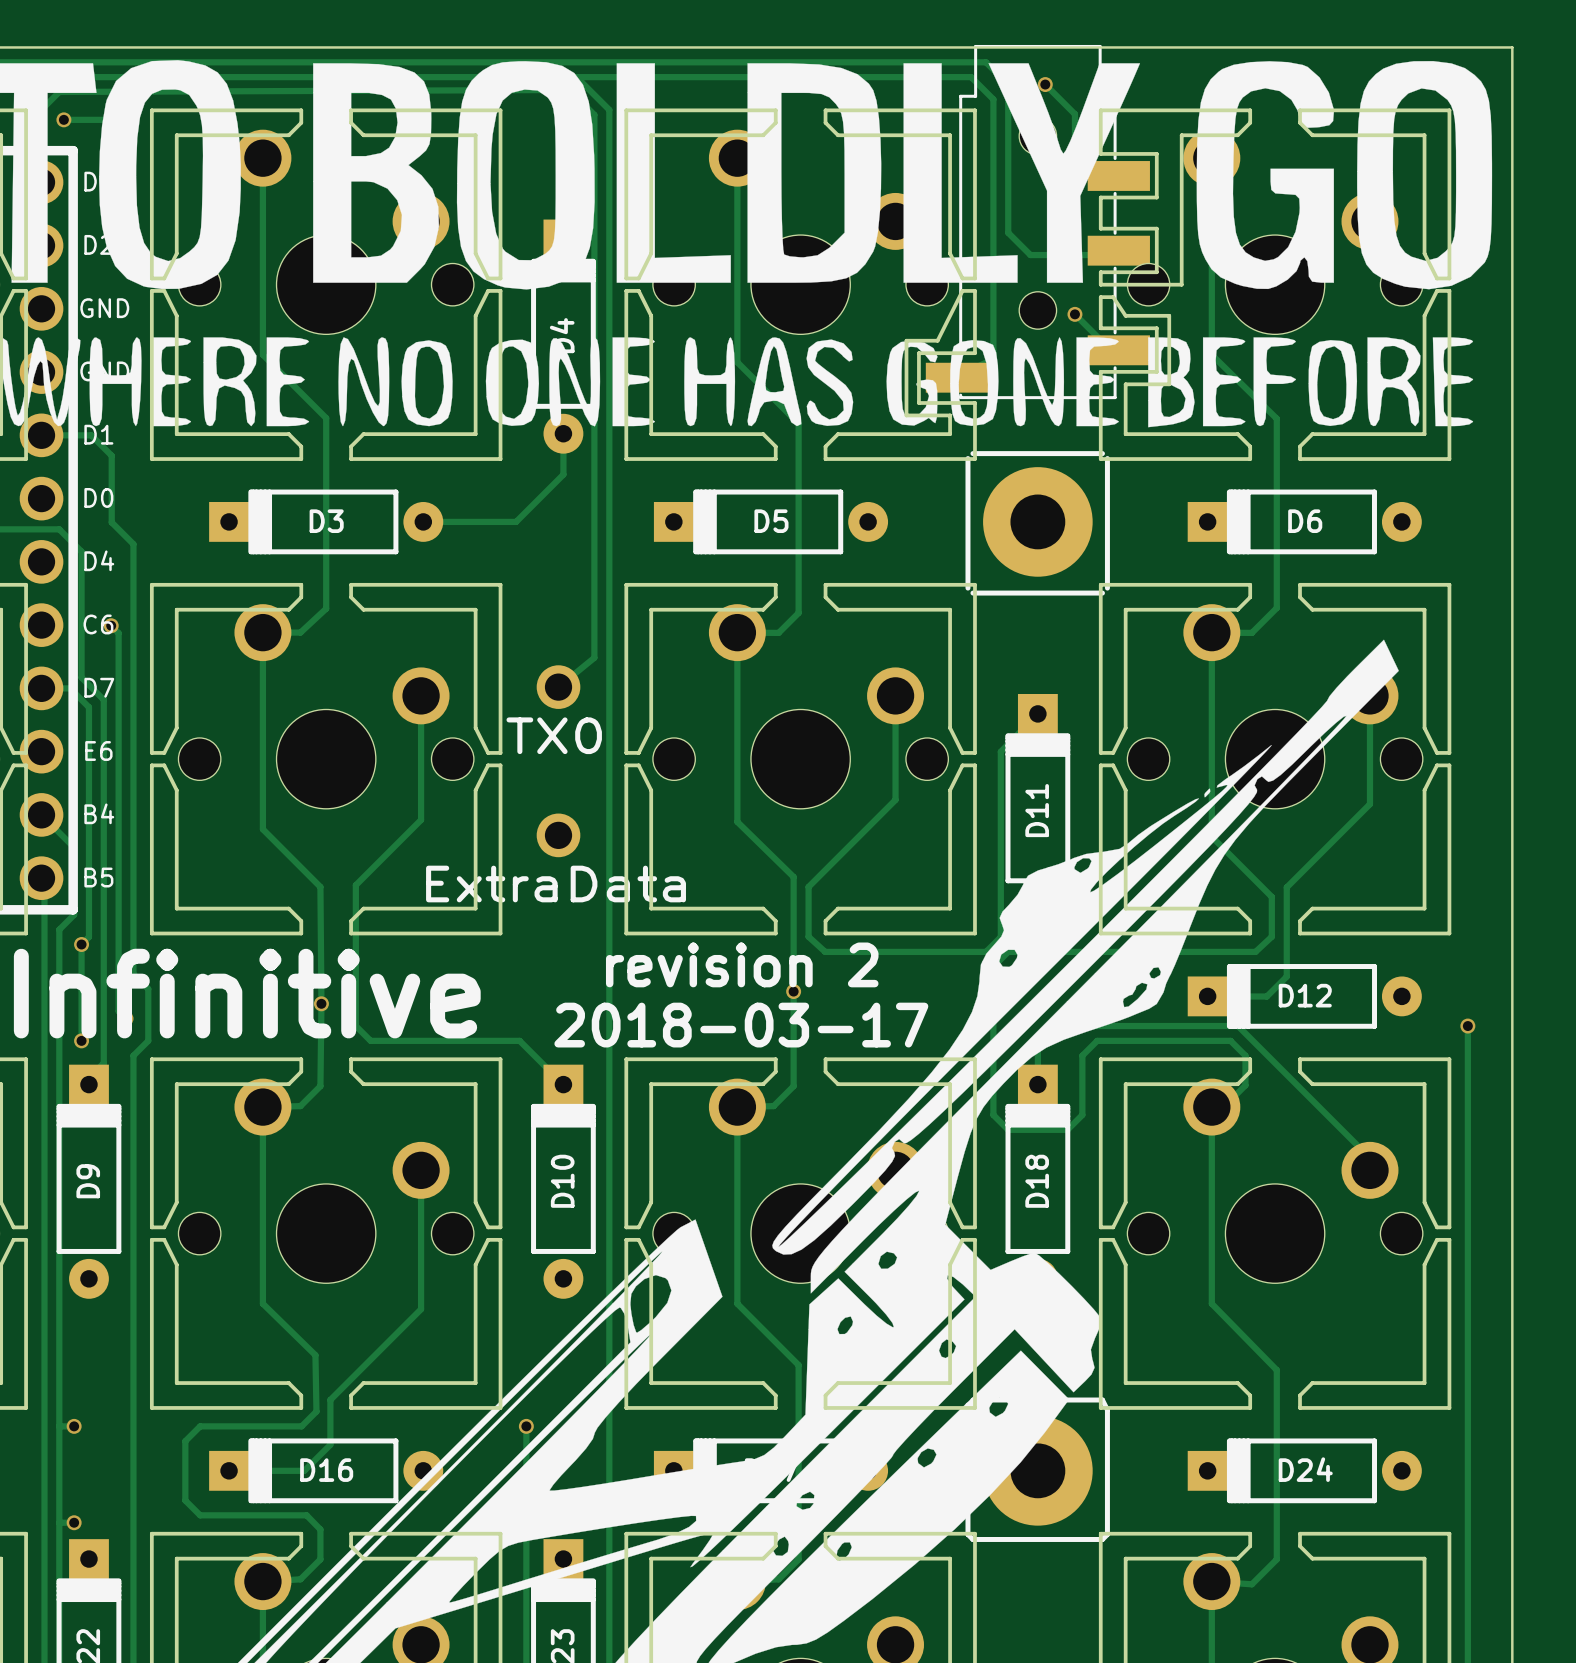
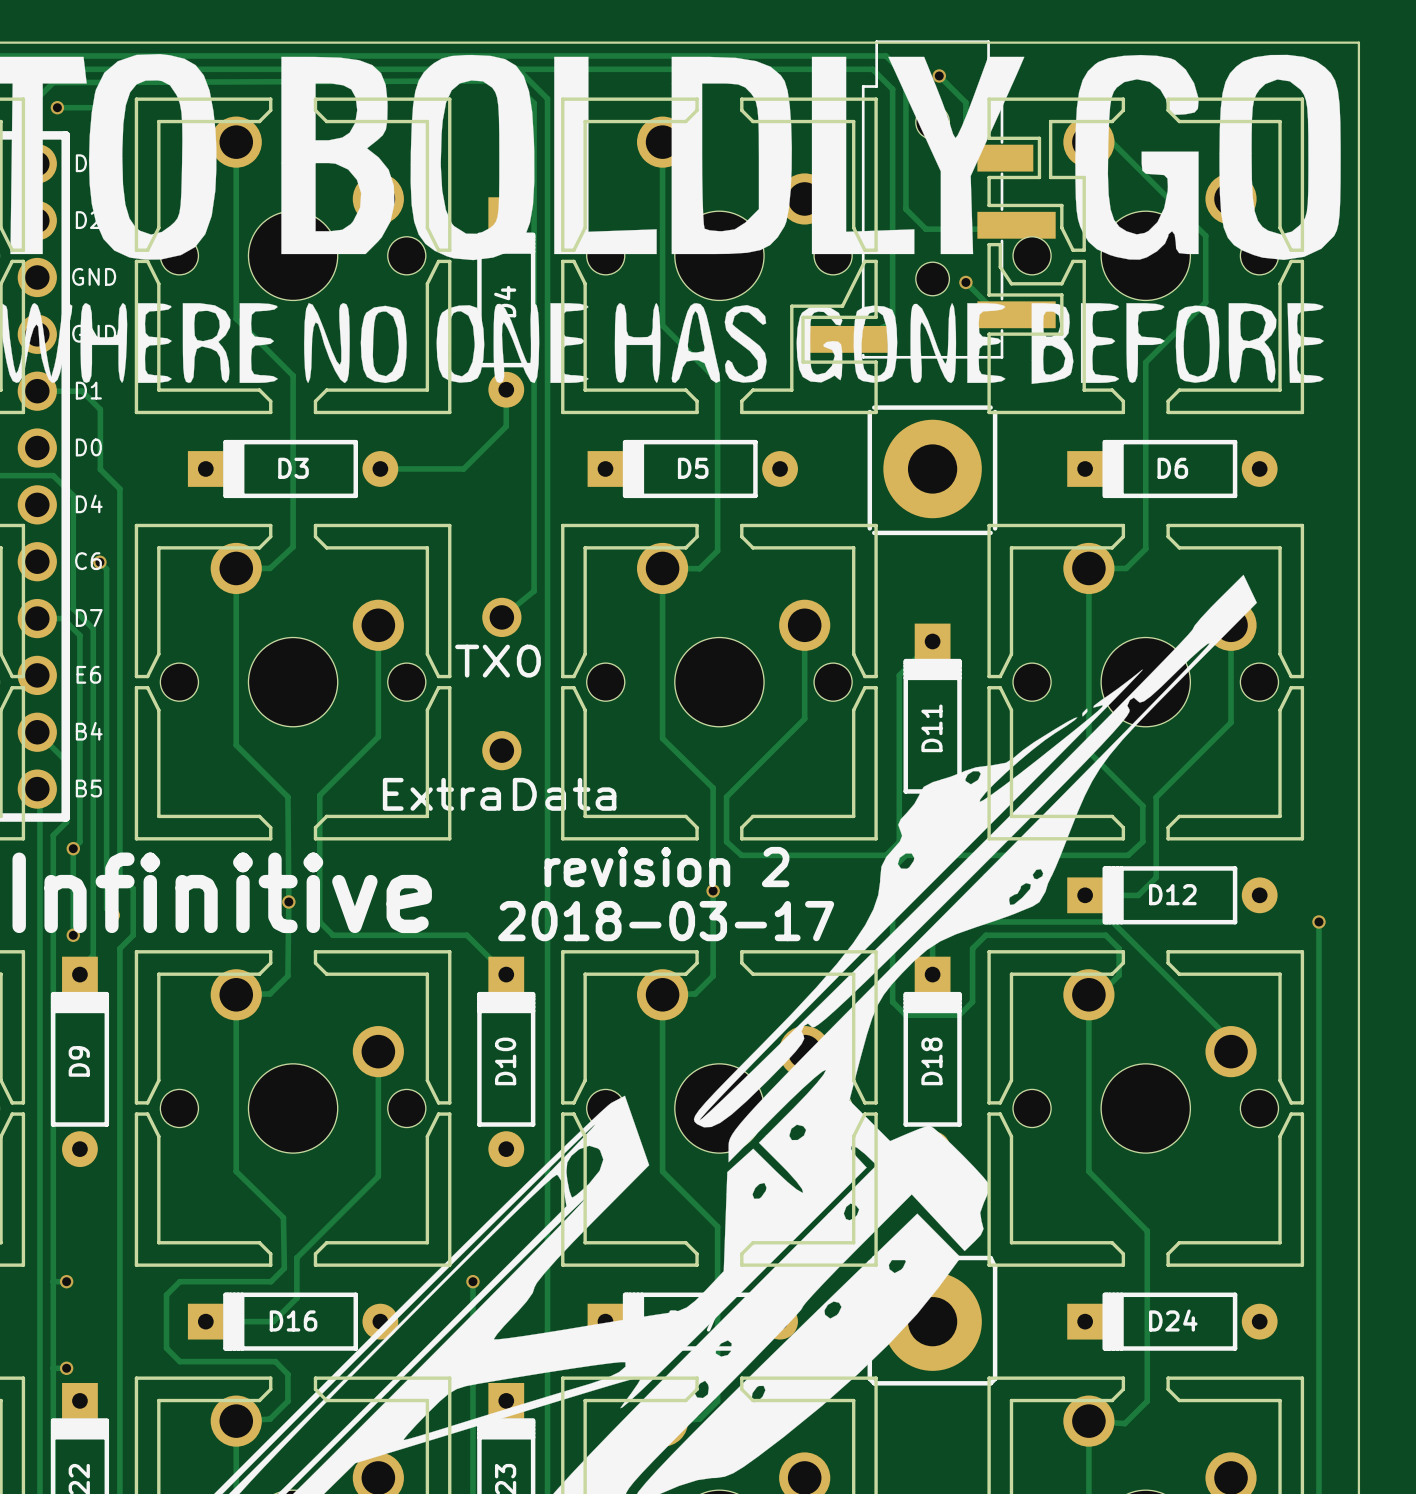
part footprint: [925, 44, 1150, 400] -> [809, 40, 1056, 359]
part footprint: [624, 108, 977, 461] -> [561, 97, 878, 415]
part footprint: [1098, 108, 1452, 461] -> [987, 97, 1305, 415]
track: (1211, 158) (1211, 354) (1276, 418) (1276, 608) (1251, 632) (1211, 632) -> (1088, 142) (1112, 142) (1205, 235) (1205, 302) (1145, 362) (1145, 548) (1126, 568) (1088, 568)

